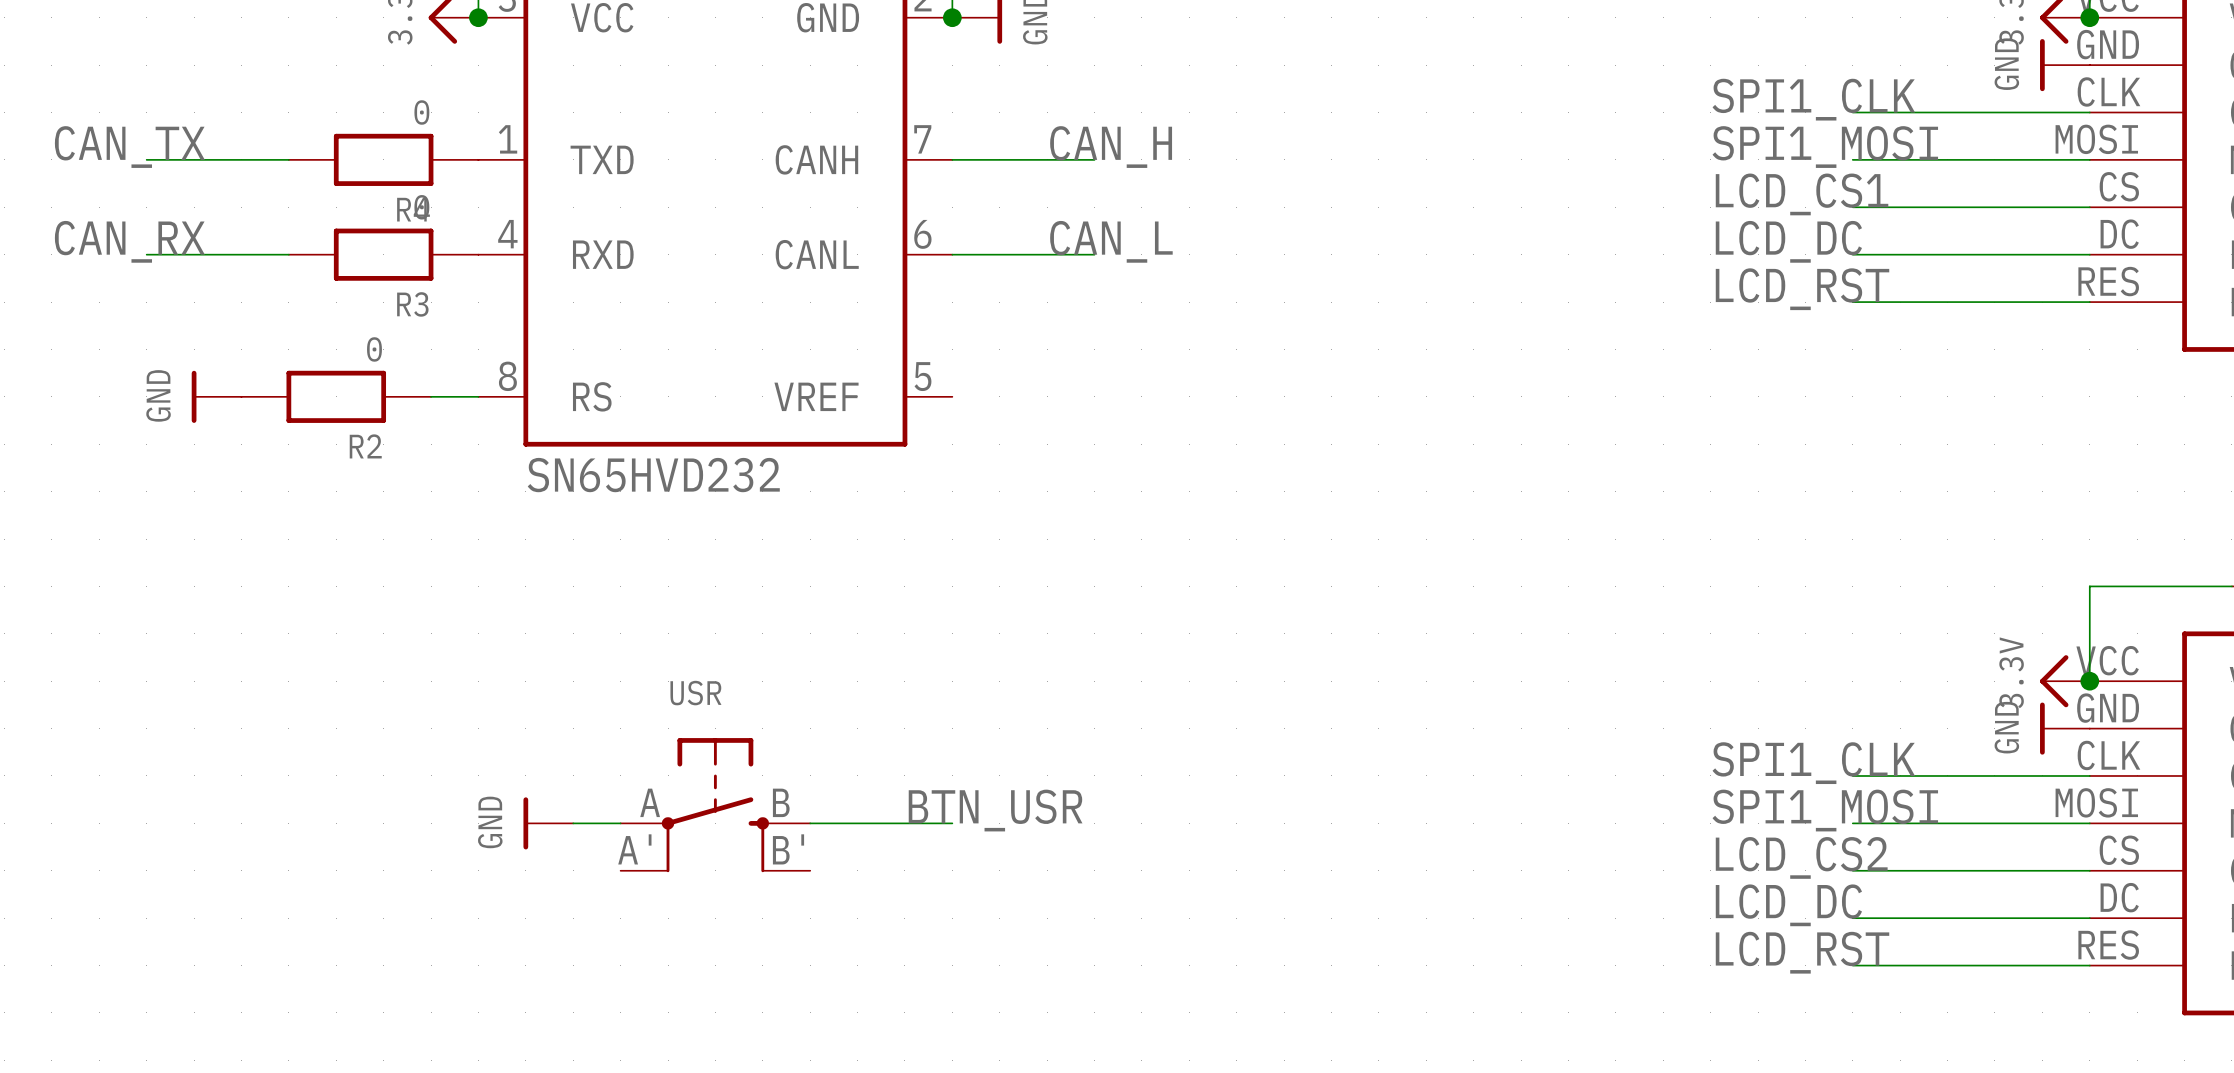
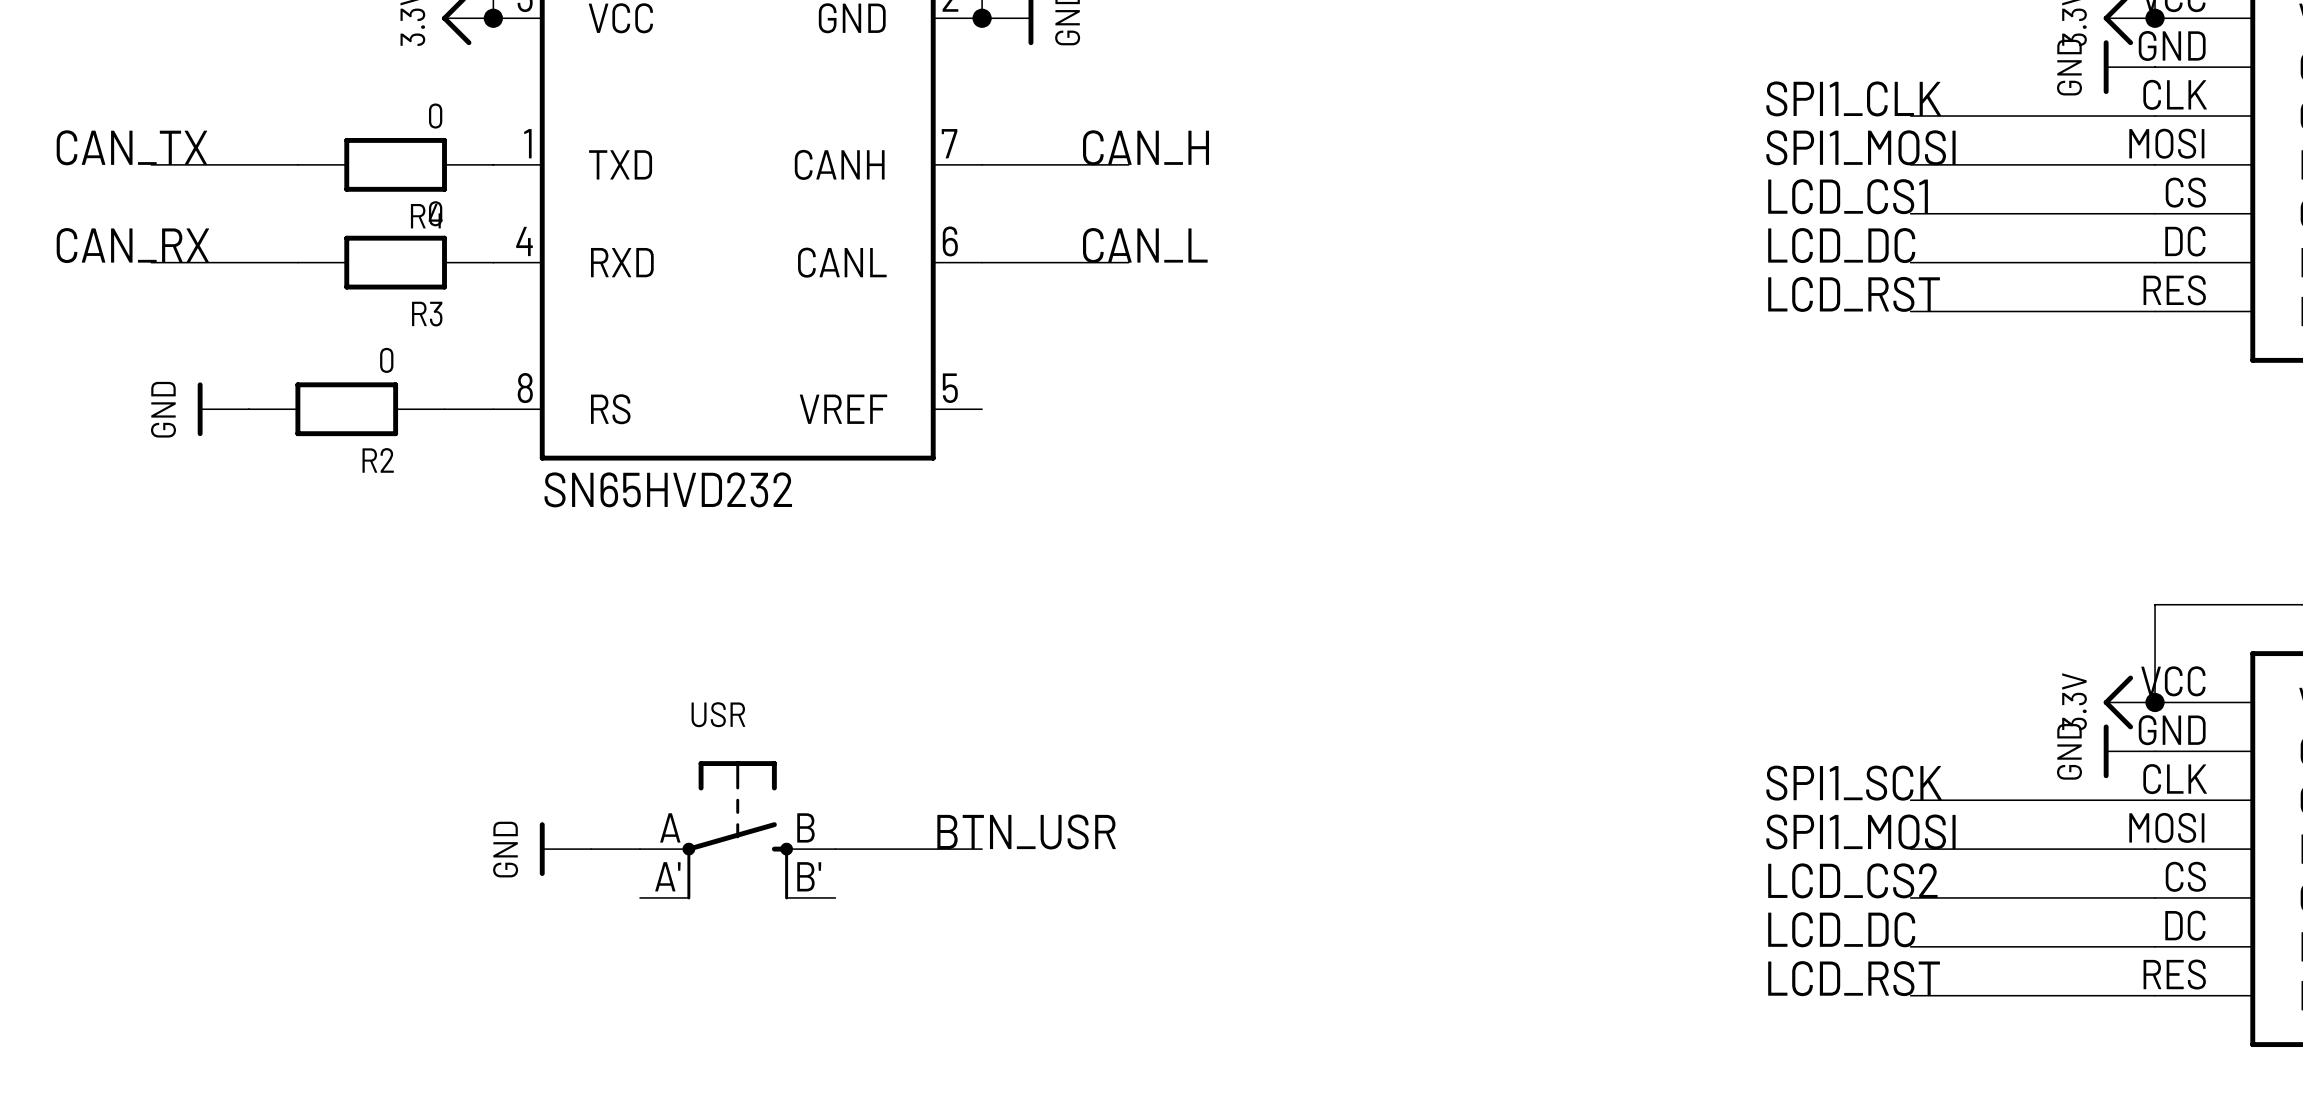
label: SPI1_CLK (1813, 763) -> SPI1_SCK (1854, 783)

